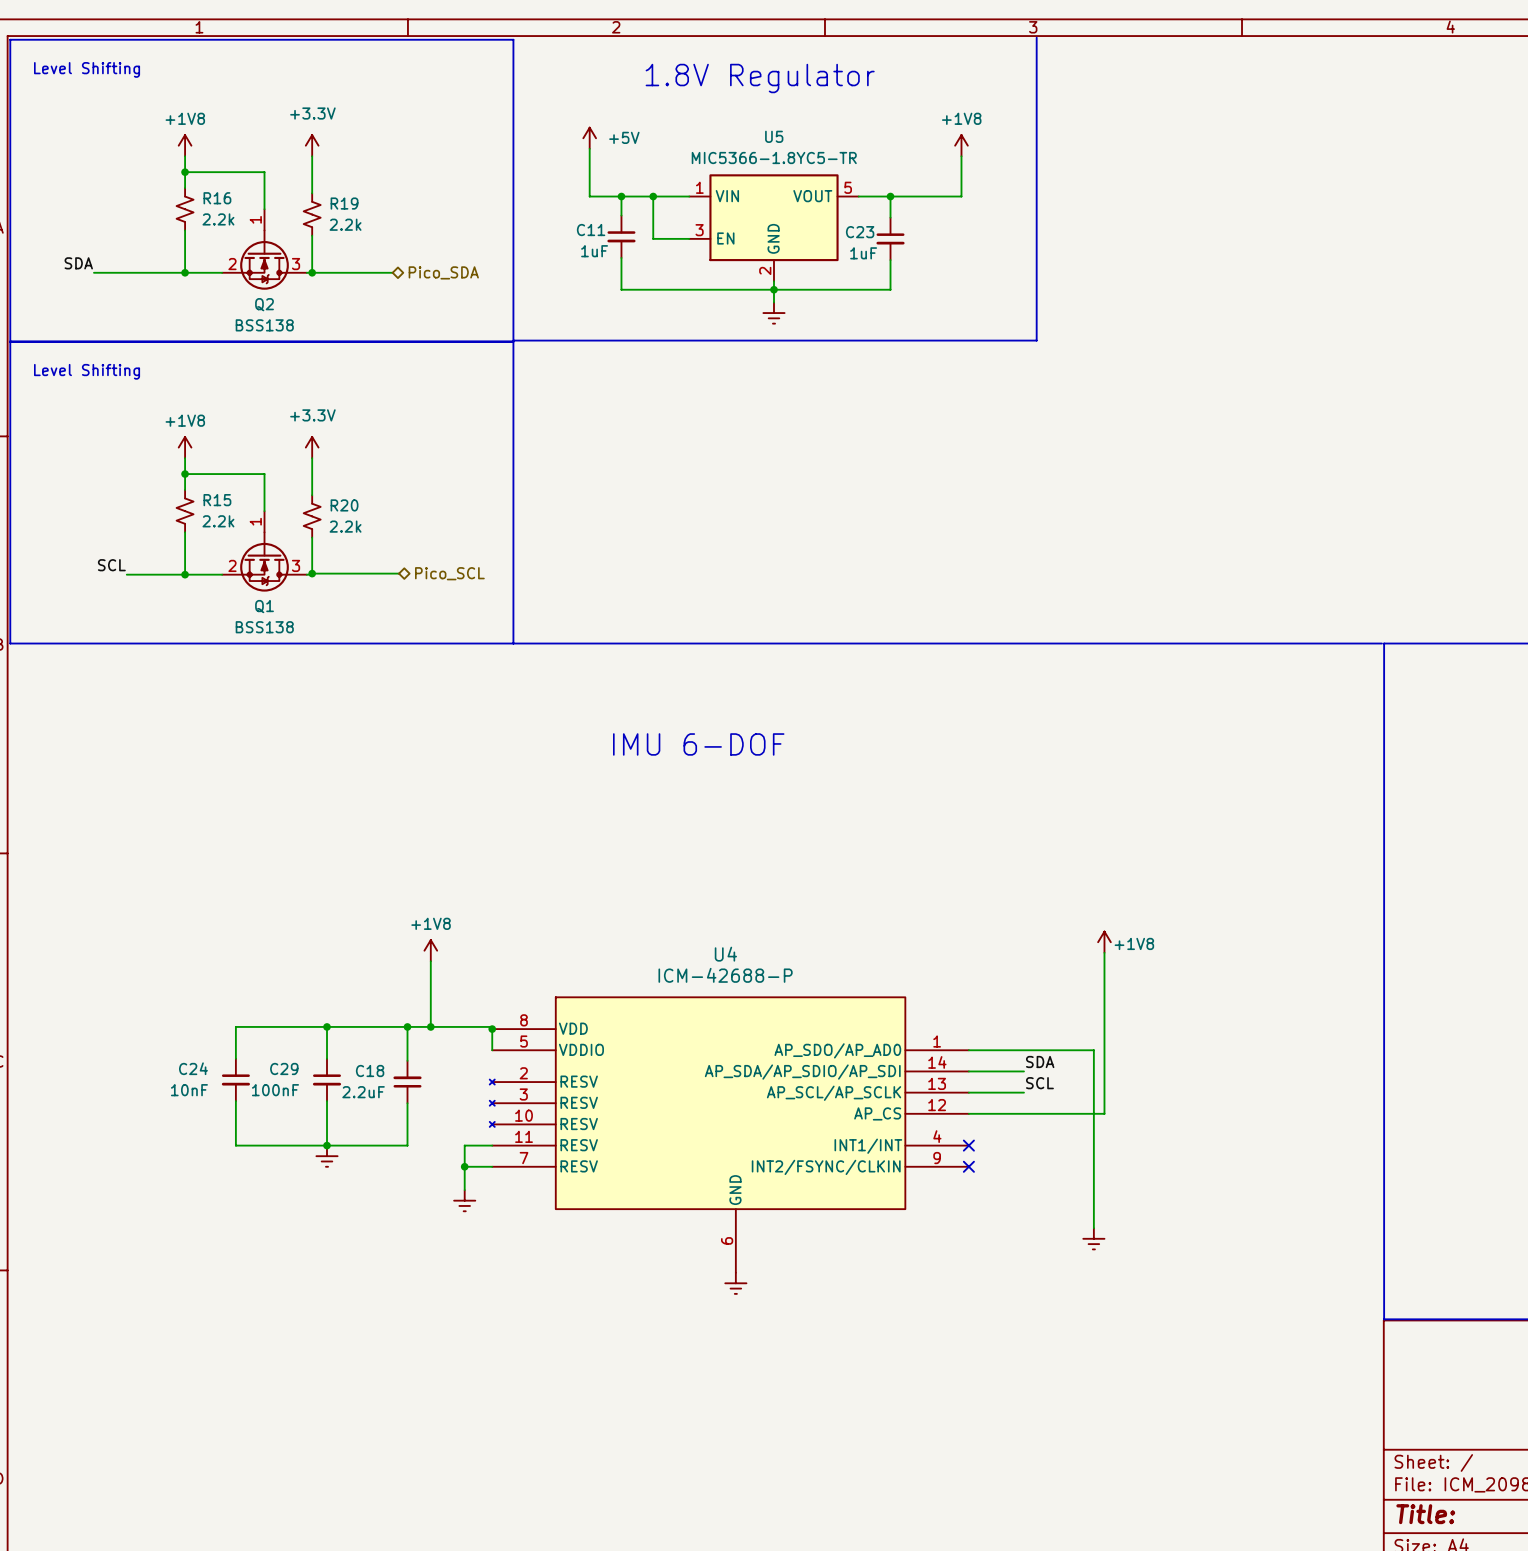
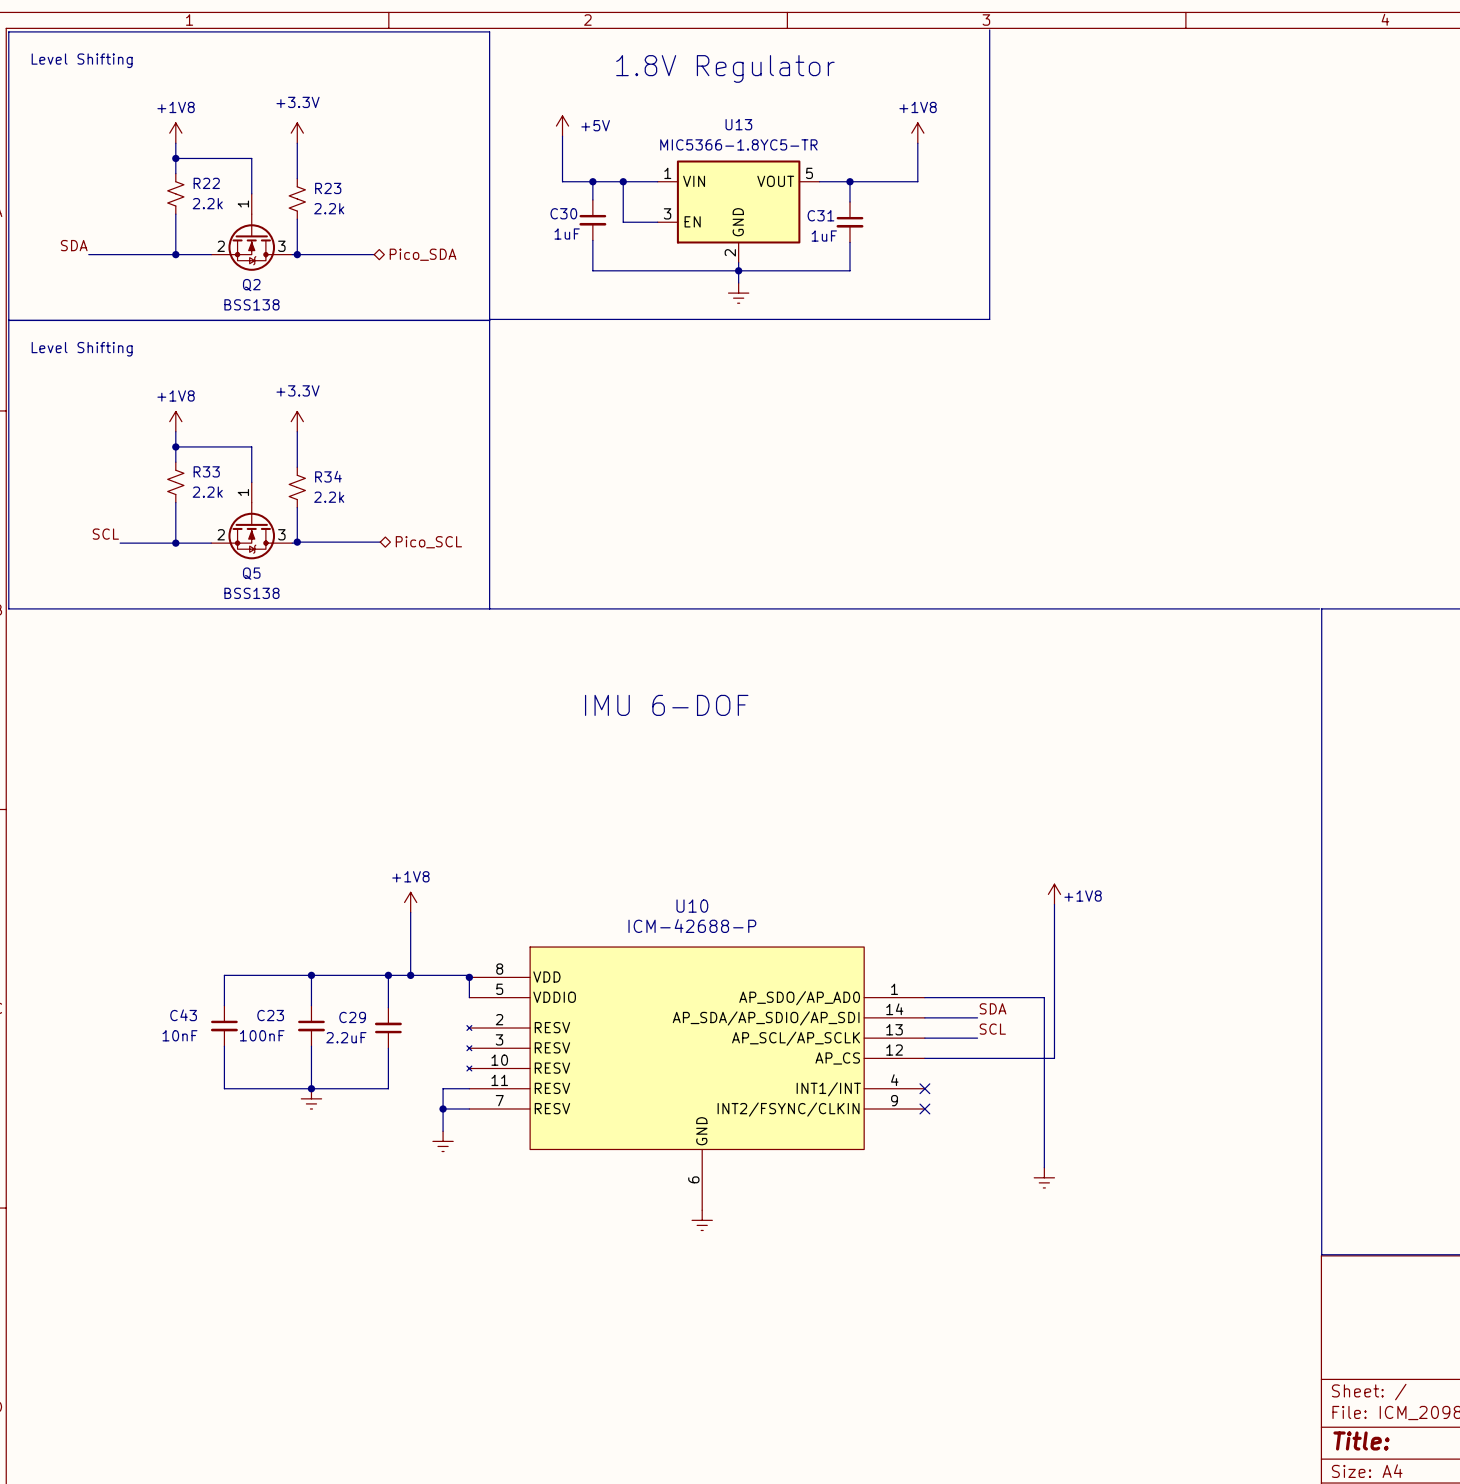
U5 name: U5 (774, 136) -> U13 (738, 124)
R16 name: R16 (217, 198) -> R22 (206, 183)
R19 name: R19 (344, 203) -> R23 (328, 188)
C11 name: C11 (591, 230) -> C30 (563, 213)
C23 name: C23 (860, 232) -> C31 (820, 215)
R15 name: R15 (217, 500) -> R33 (206, 471)
R20 name: R20 (344, 505) -> R34 (328, 476)
Q1 name: Q1 (264, 606) -> Q5 (251, 573)
U4 name: U4 (725, 954) -> U10 (692, 906)
C24 name: C24 (193, 1068) -> C43 (183, 1015)
C29 name: C29 (284, 1068) -> C23 (270, 1015)
C18 name: C18 (370, 1071) -> C29 (352, 1017)

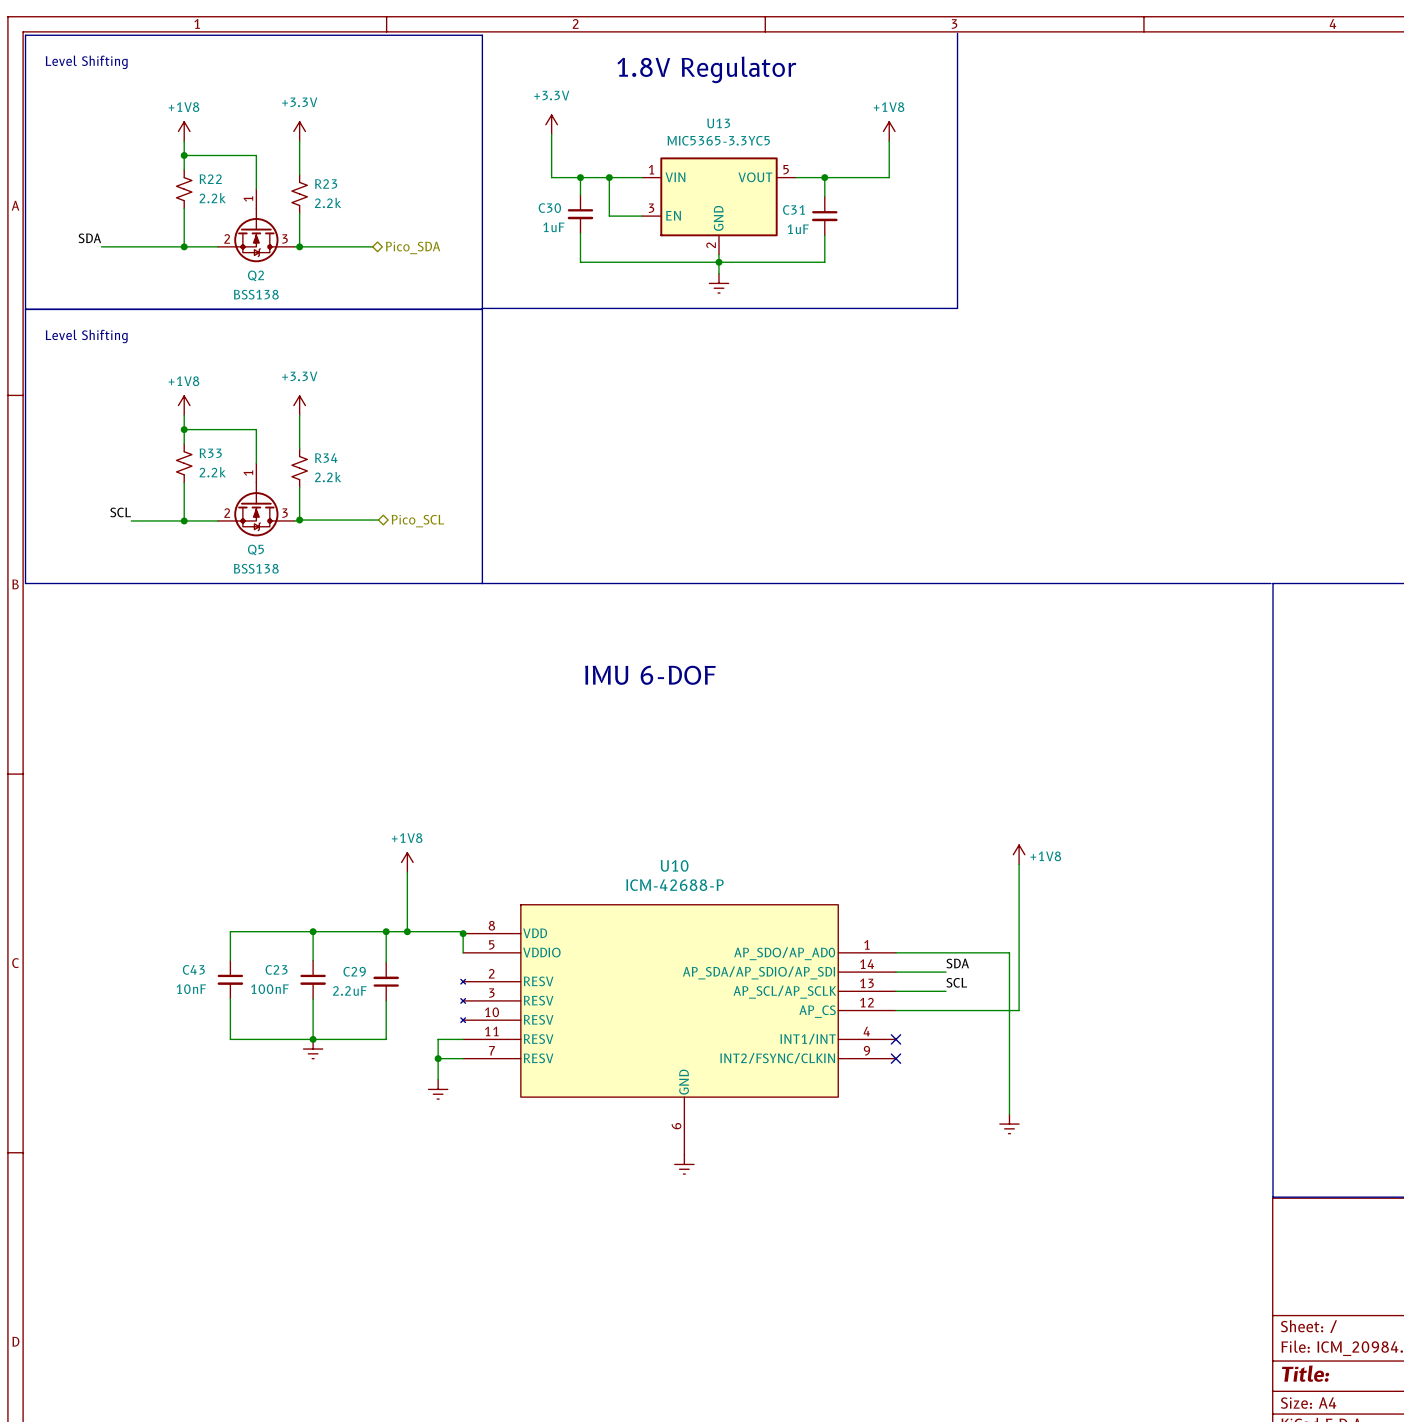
power symbol: +5V (562, 126) -> +3.3V (551, 124)
U13 value: MIC5366-1.8YC5-TR (738, 144) -> MIC5365-3.3YC5 (718, 140)

